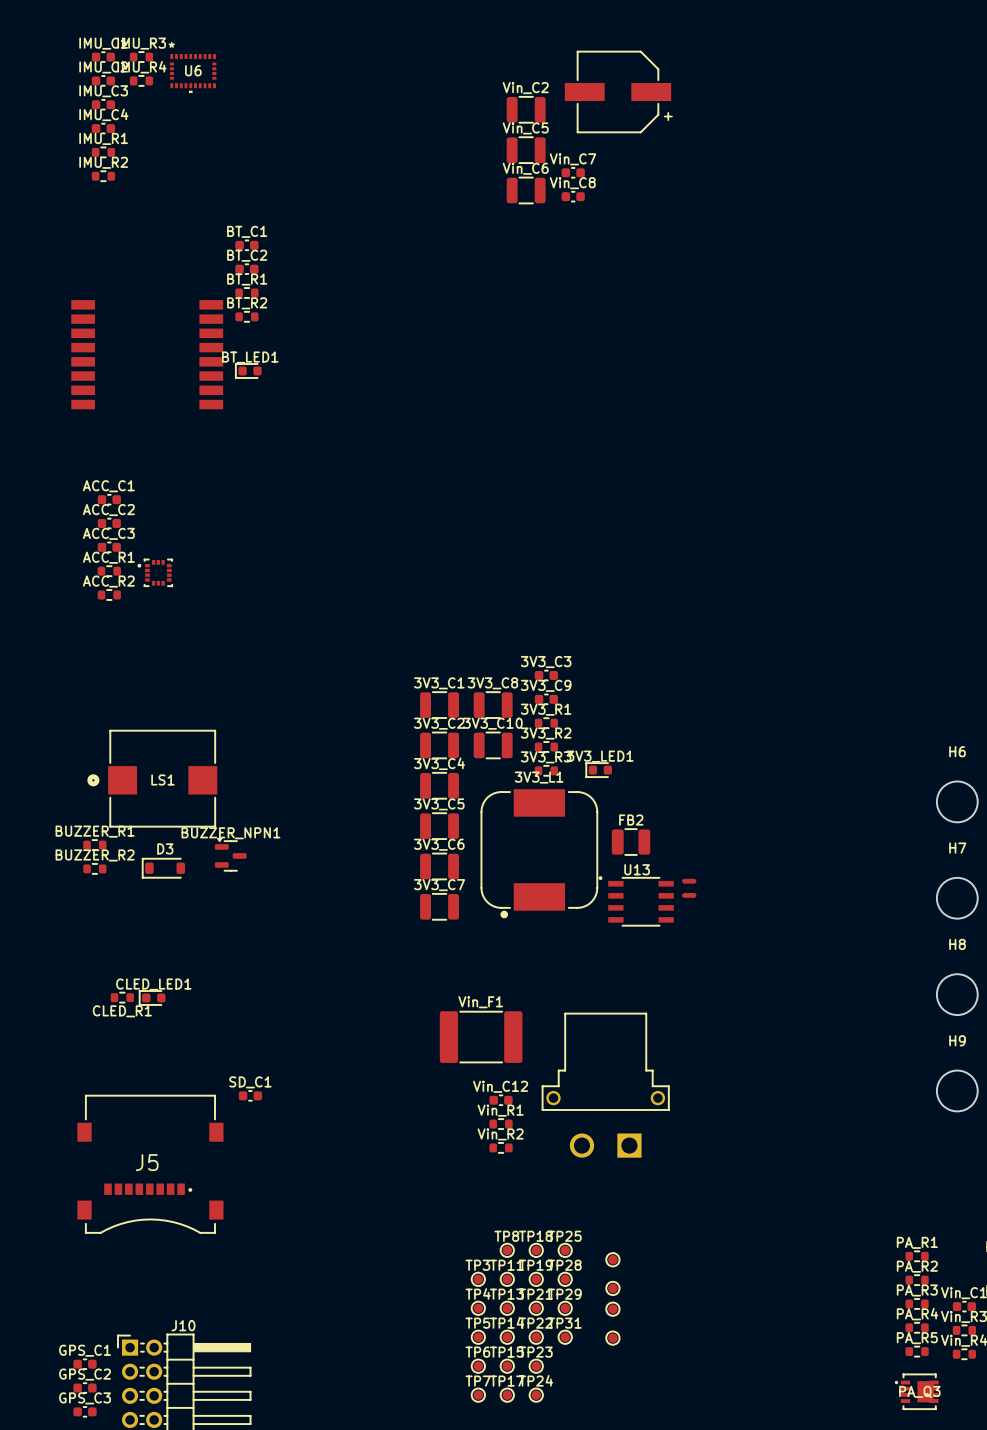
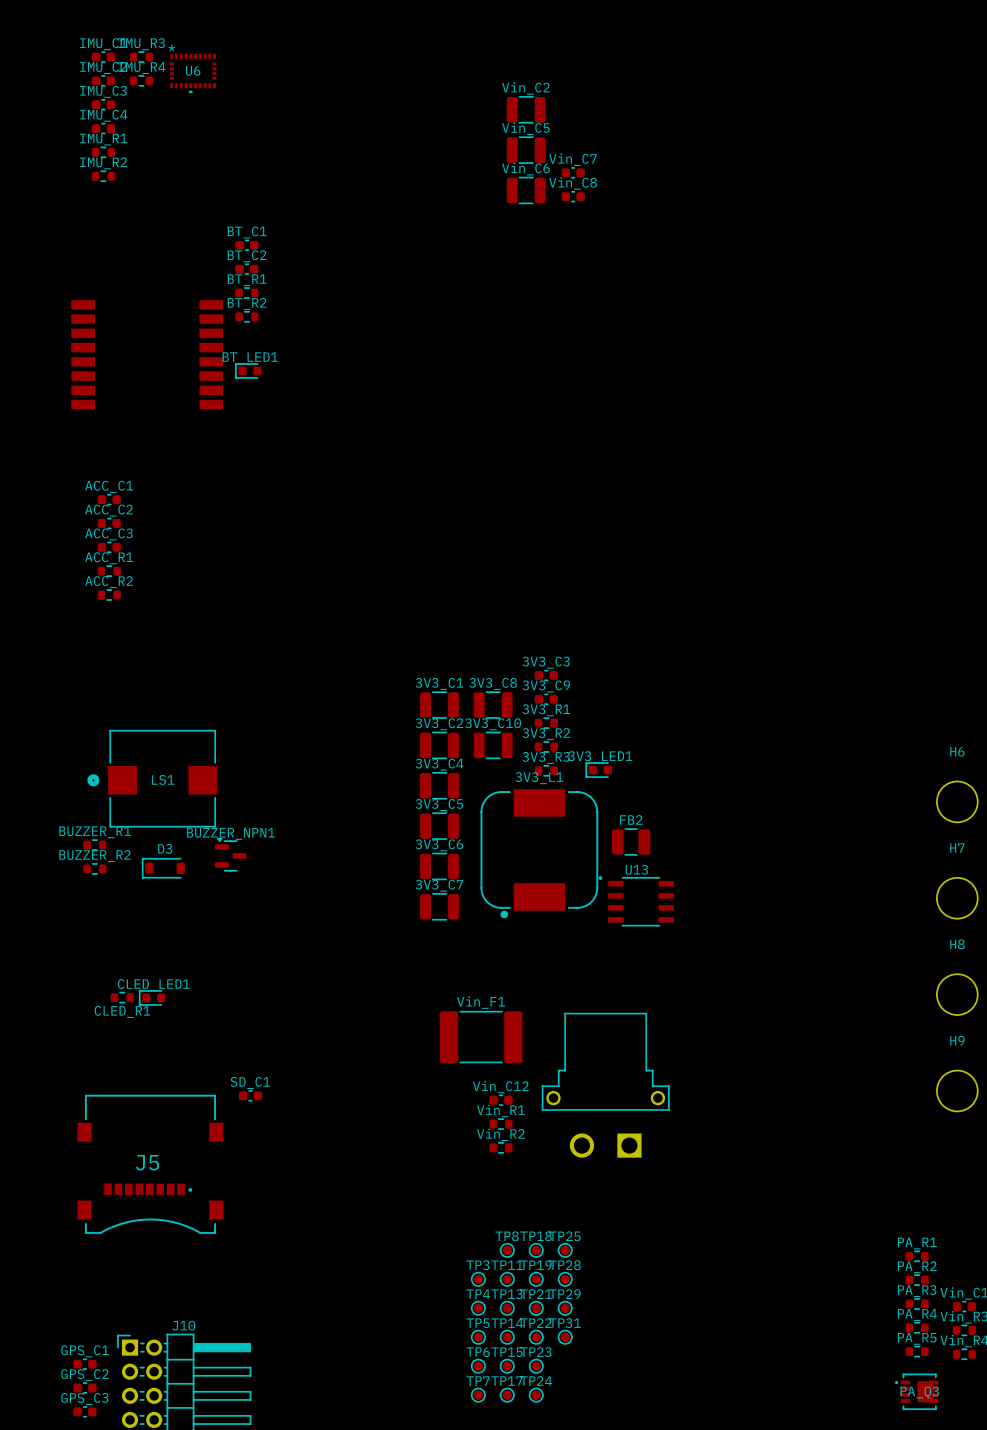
part: (617, 91) -> none
part: (155, 572) -> none
part: (689, 881) -> none
part: (689, 895) -> none
part: (612, 1259) -> none
part: (612, 1288) -> none
part: (612, 1309) -> none
part: (612, 1338) -> none

